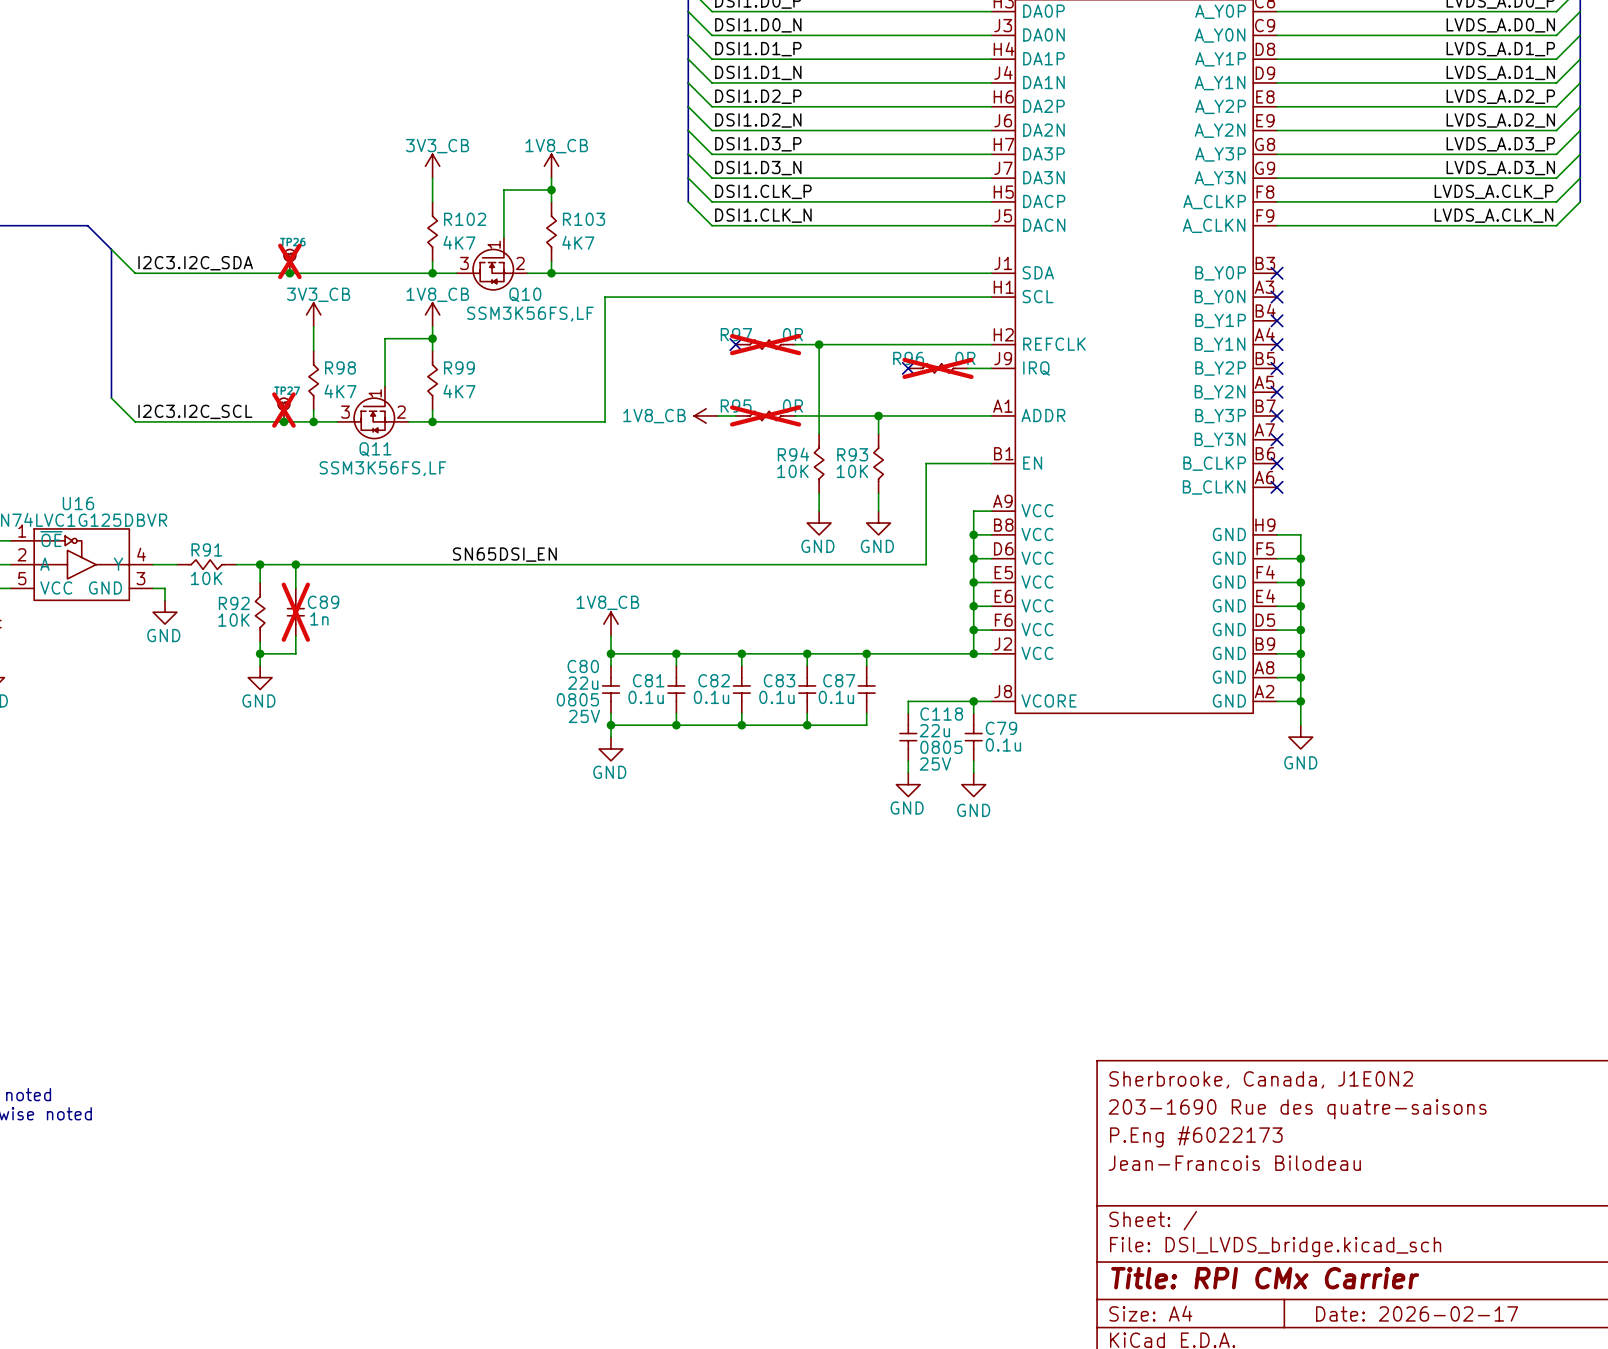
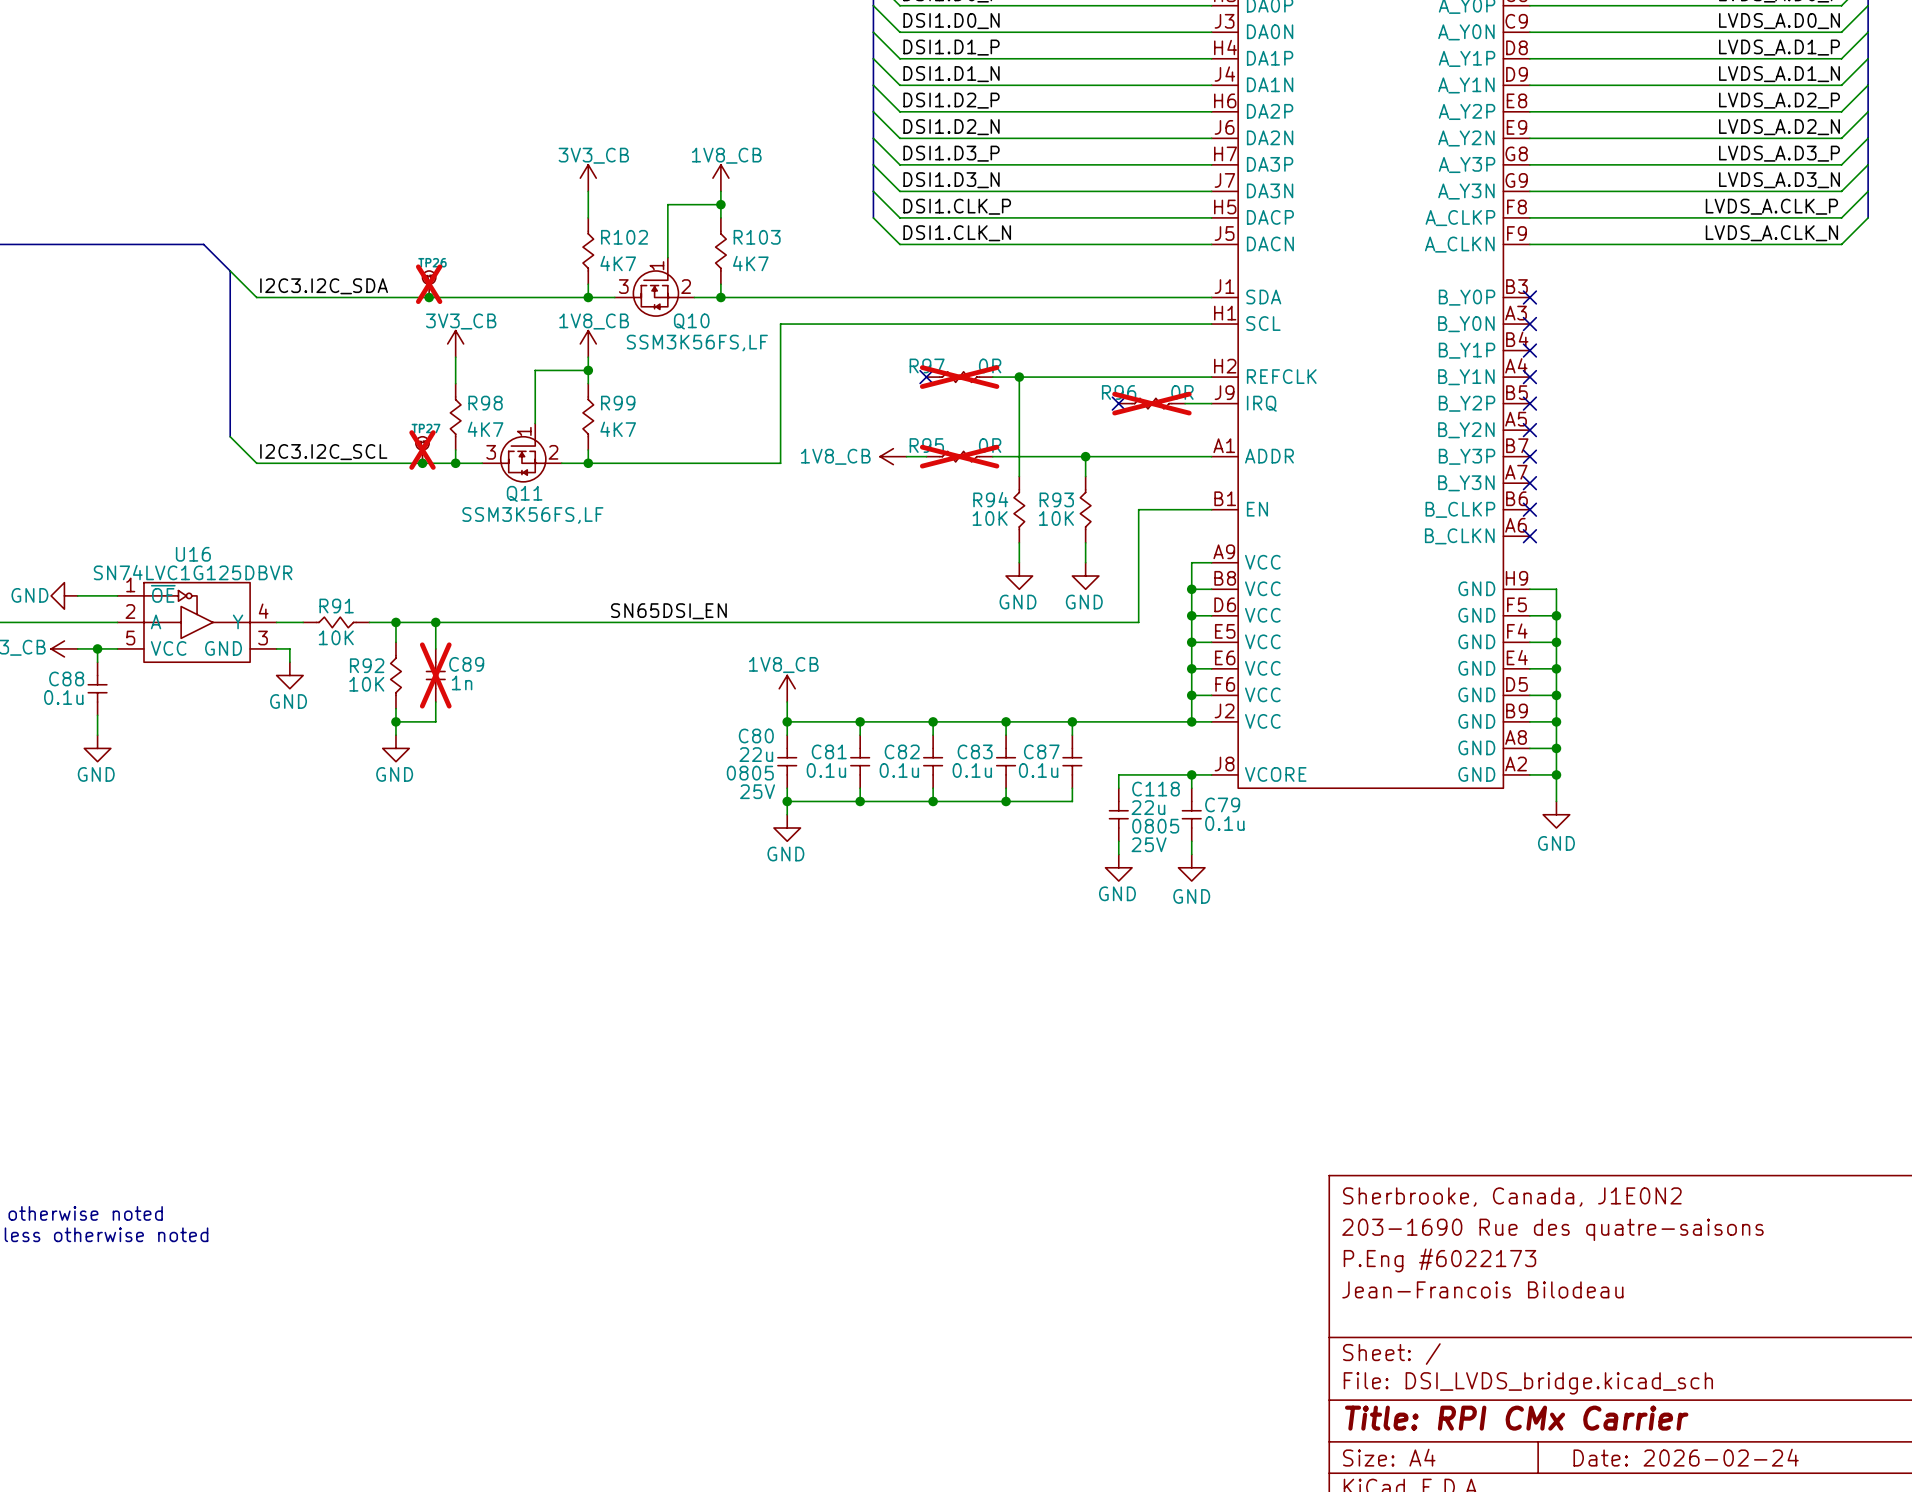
title block: Date: 2026-02-17 (1417, 1313) -> Date: 2026-02-24 (1686, 1457)

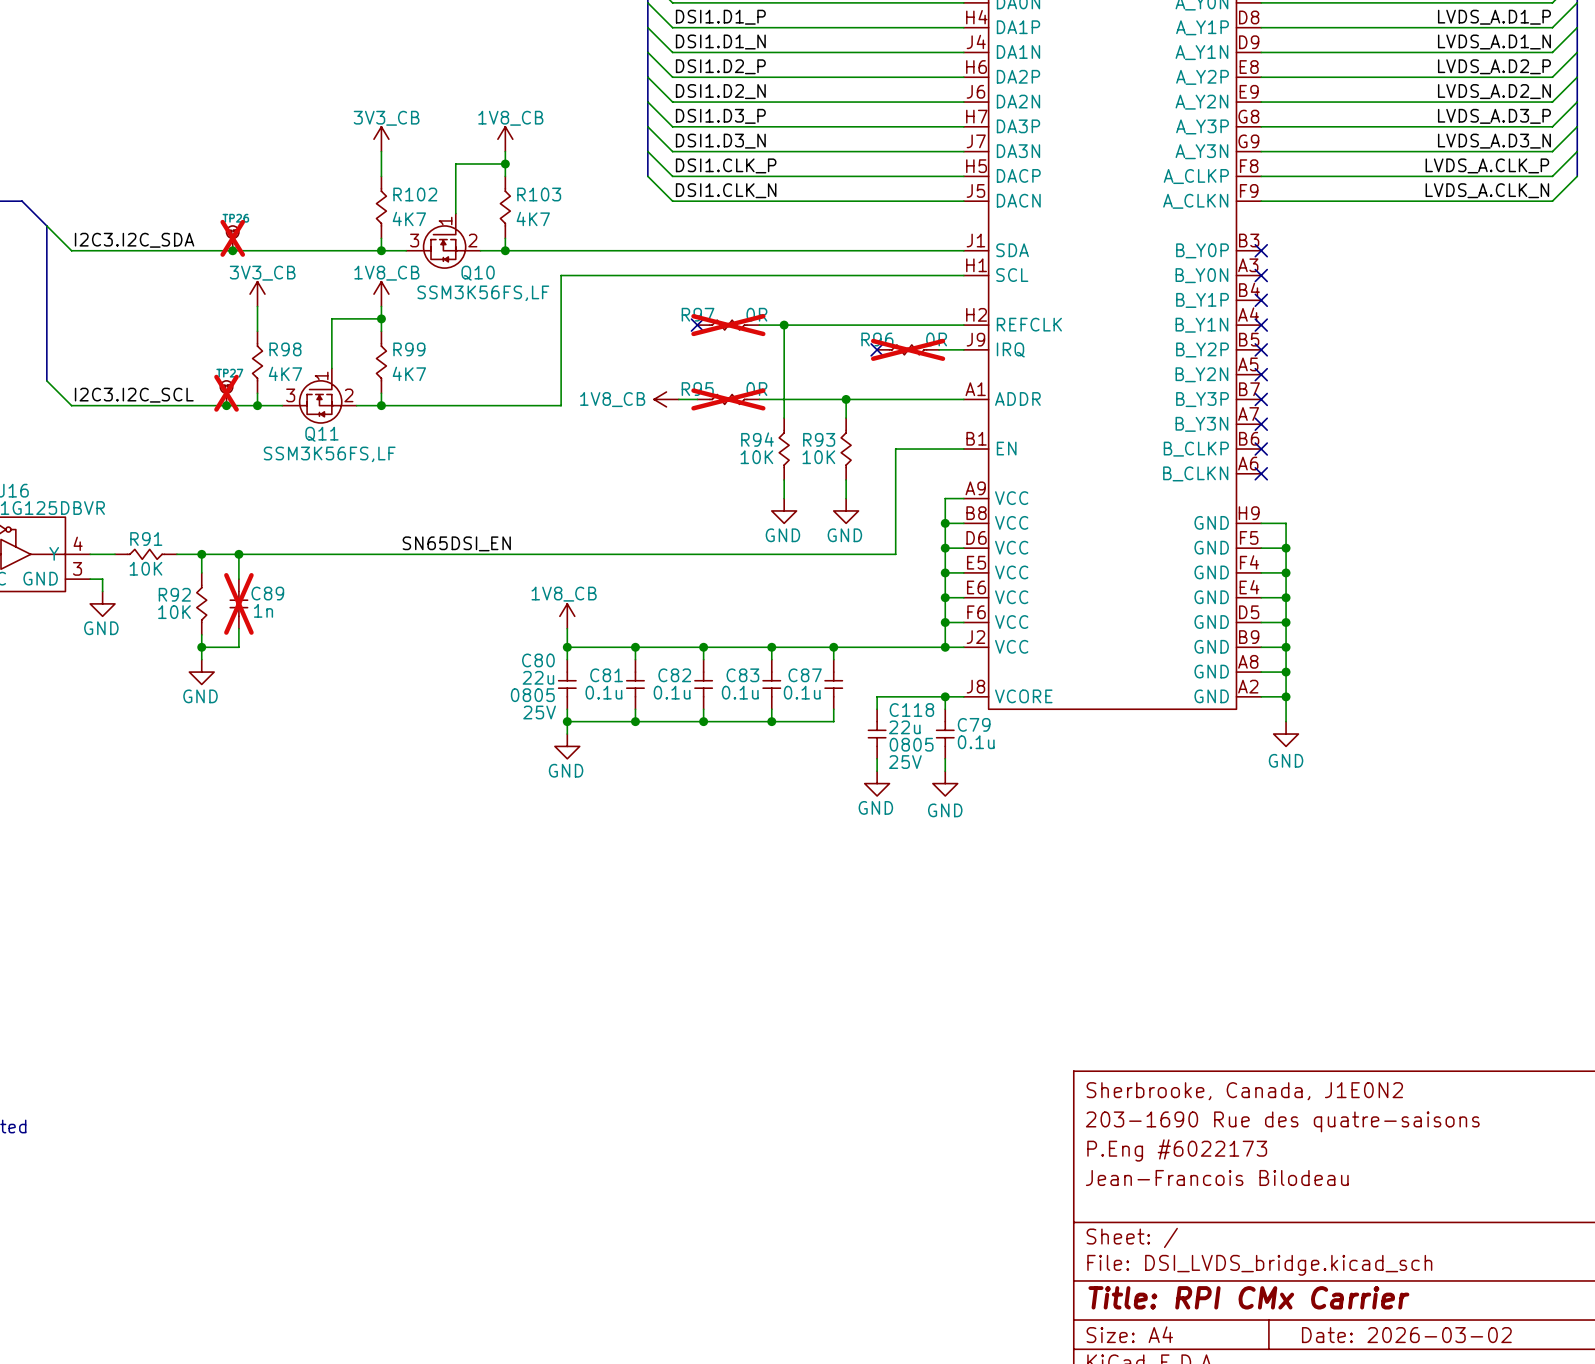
title block: Date: 2026-02-24 (1686, 1457) -> Date: 2026-03-02 (1406, 1335)

